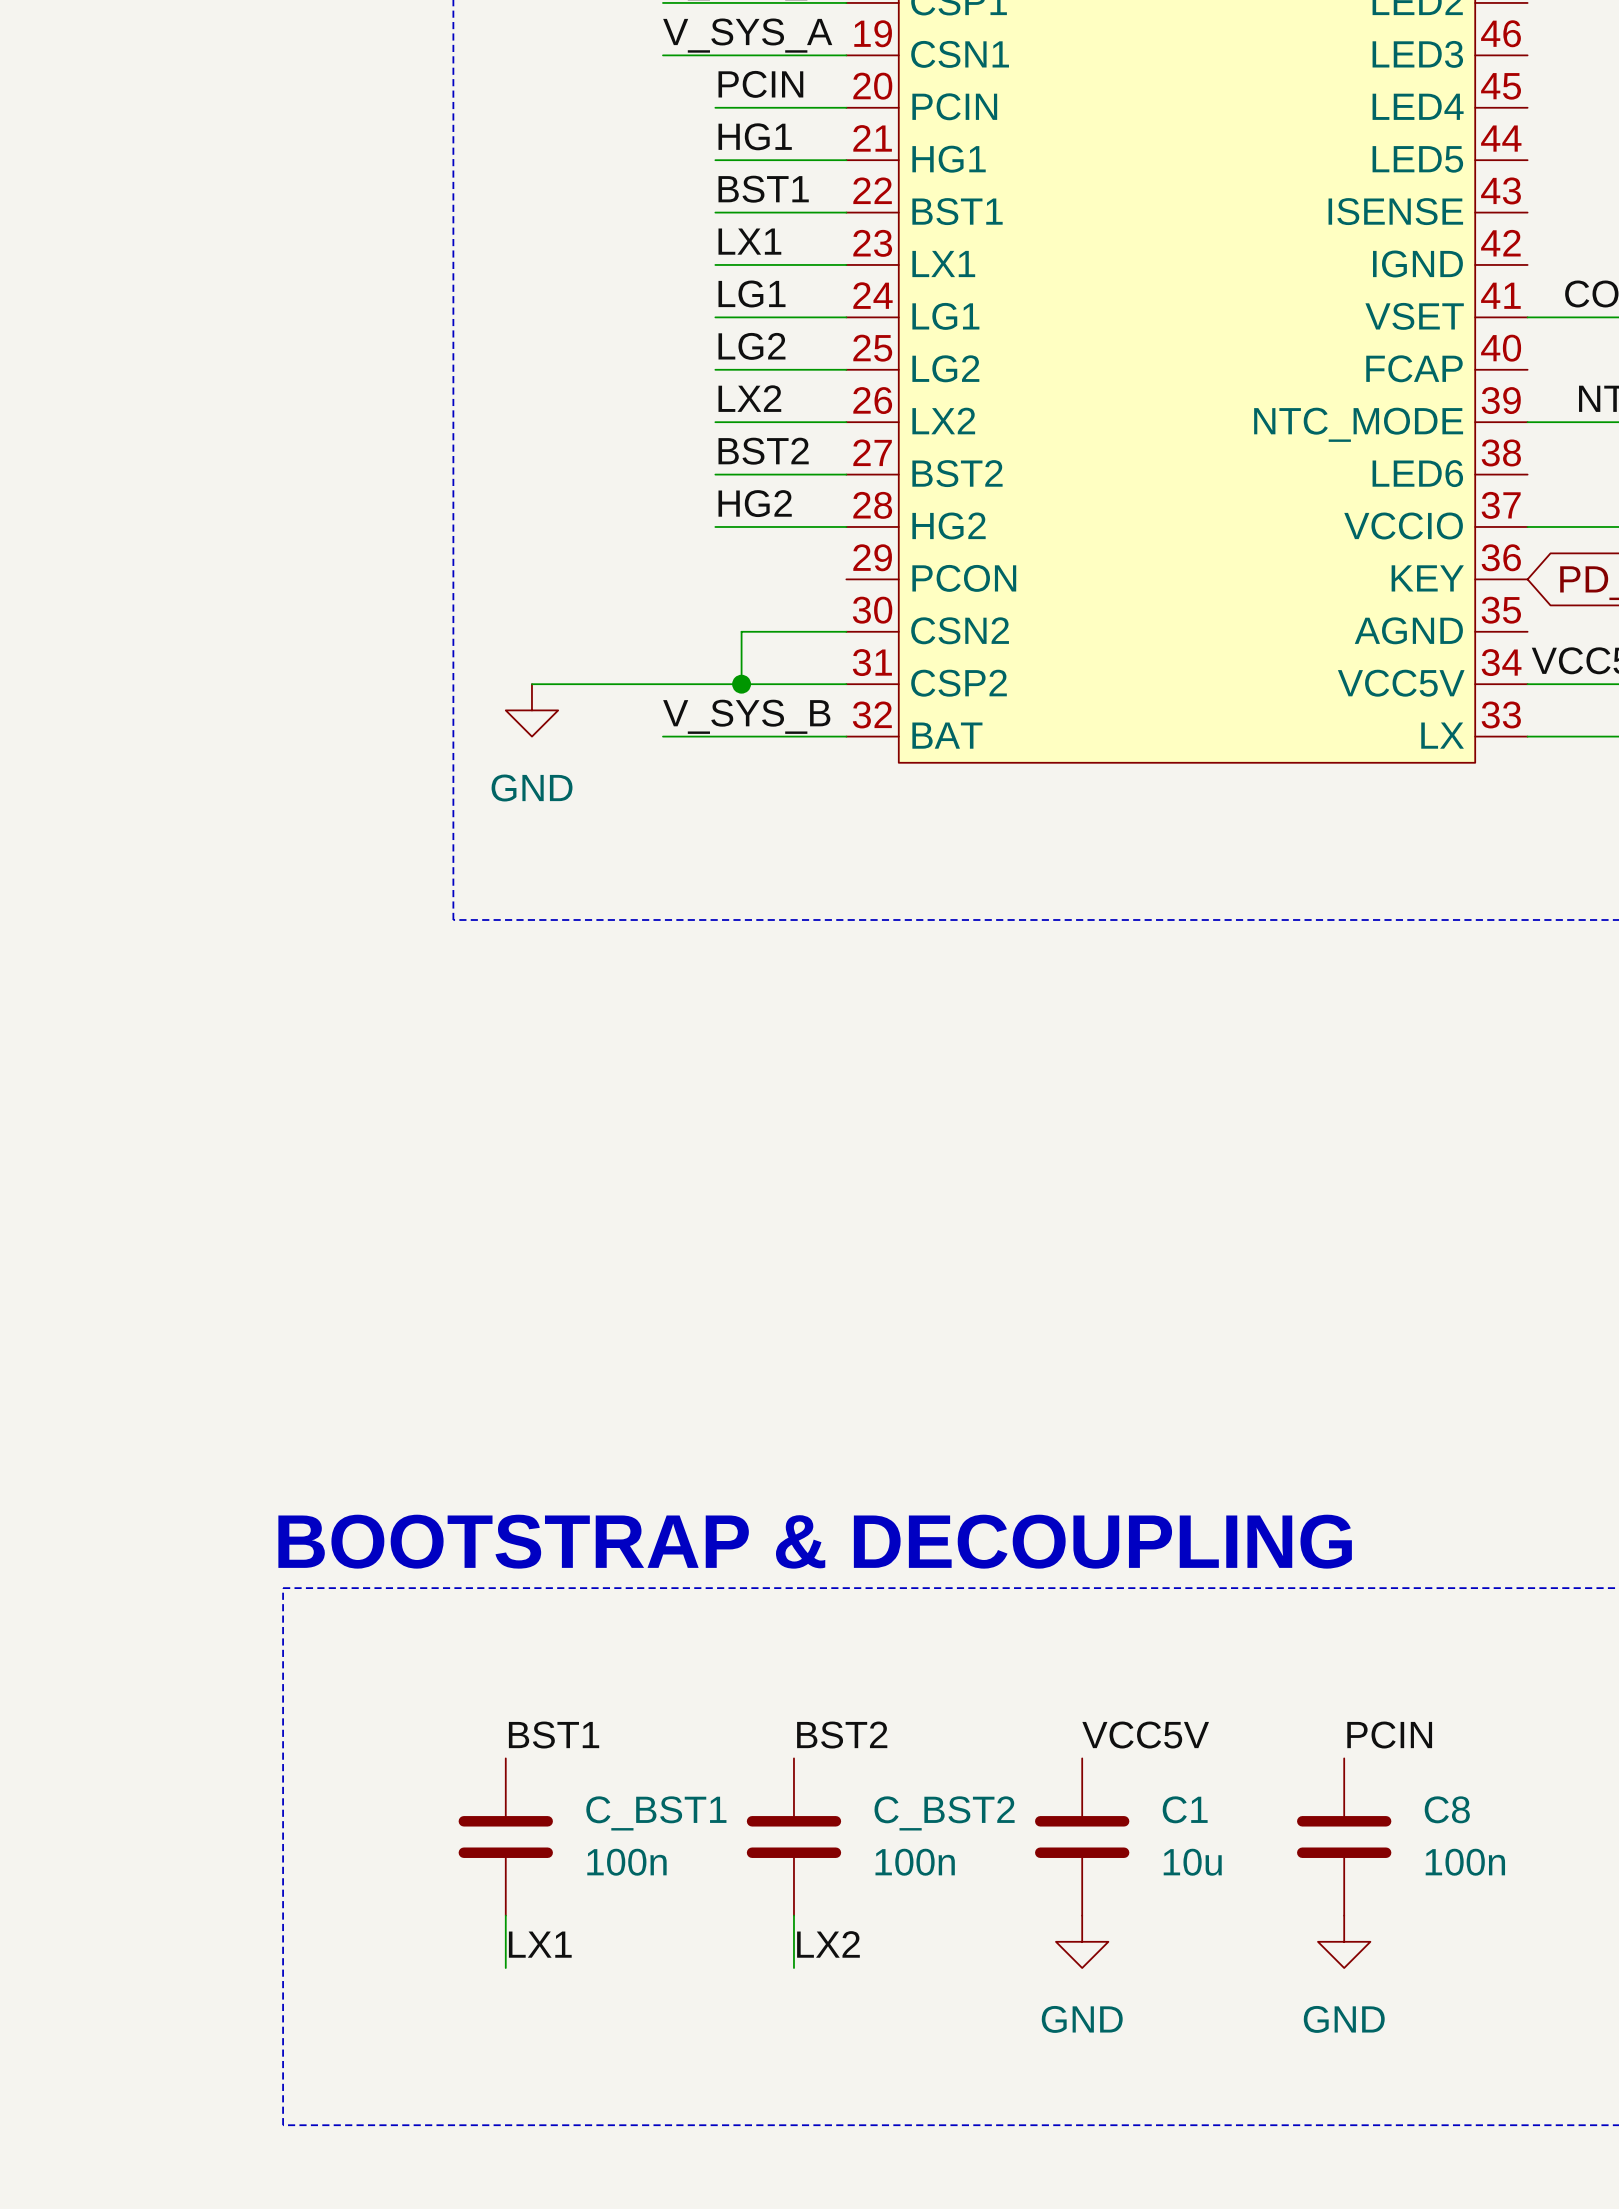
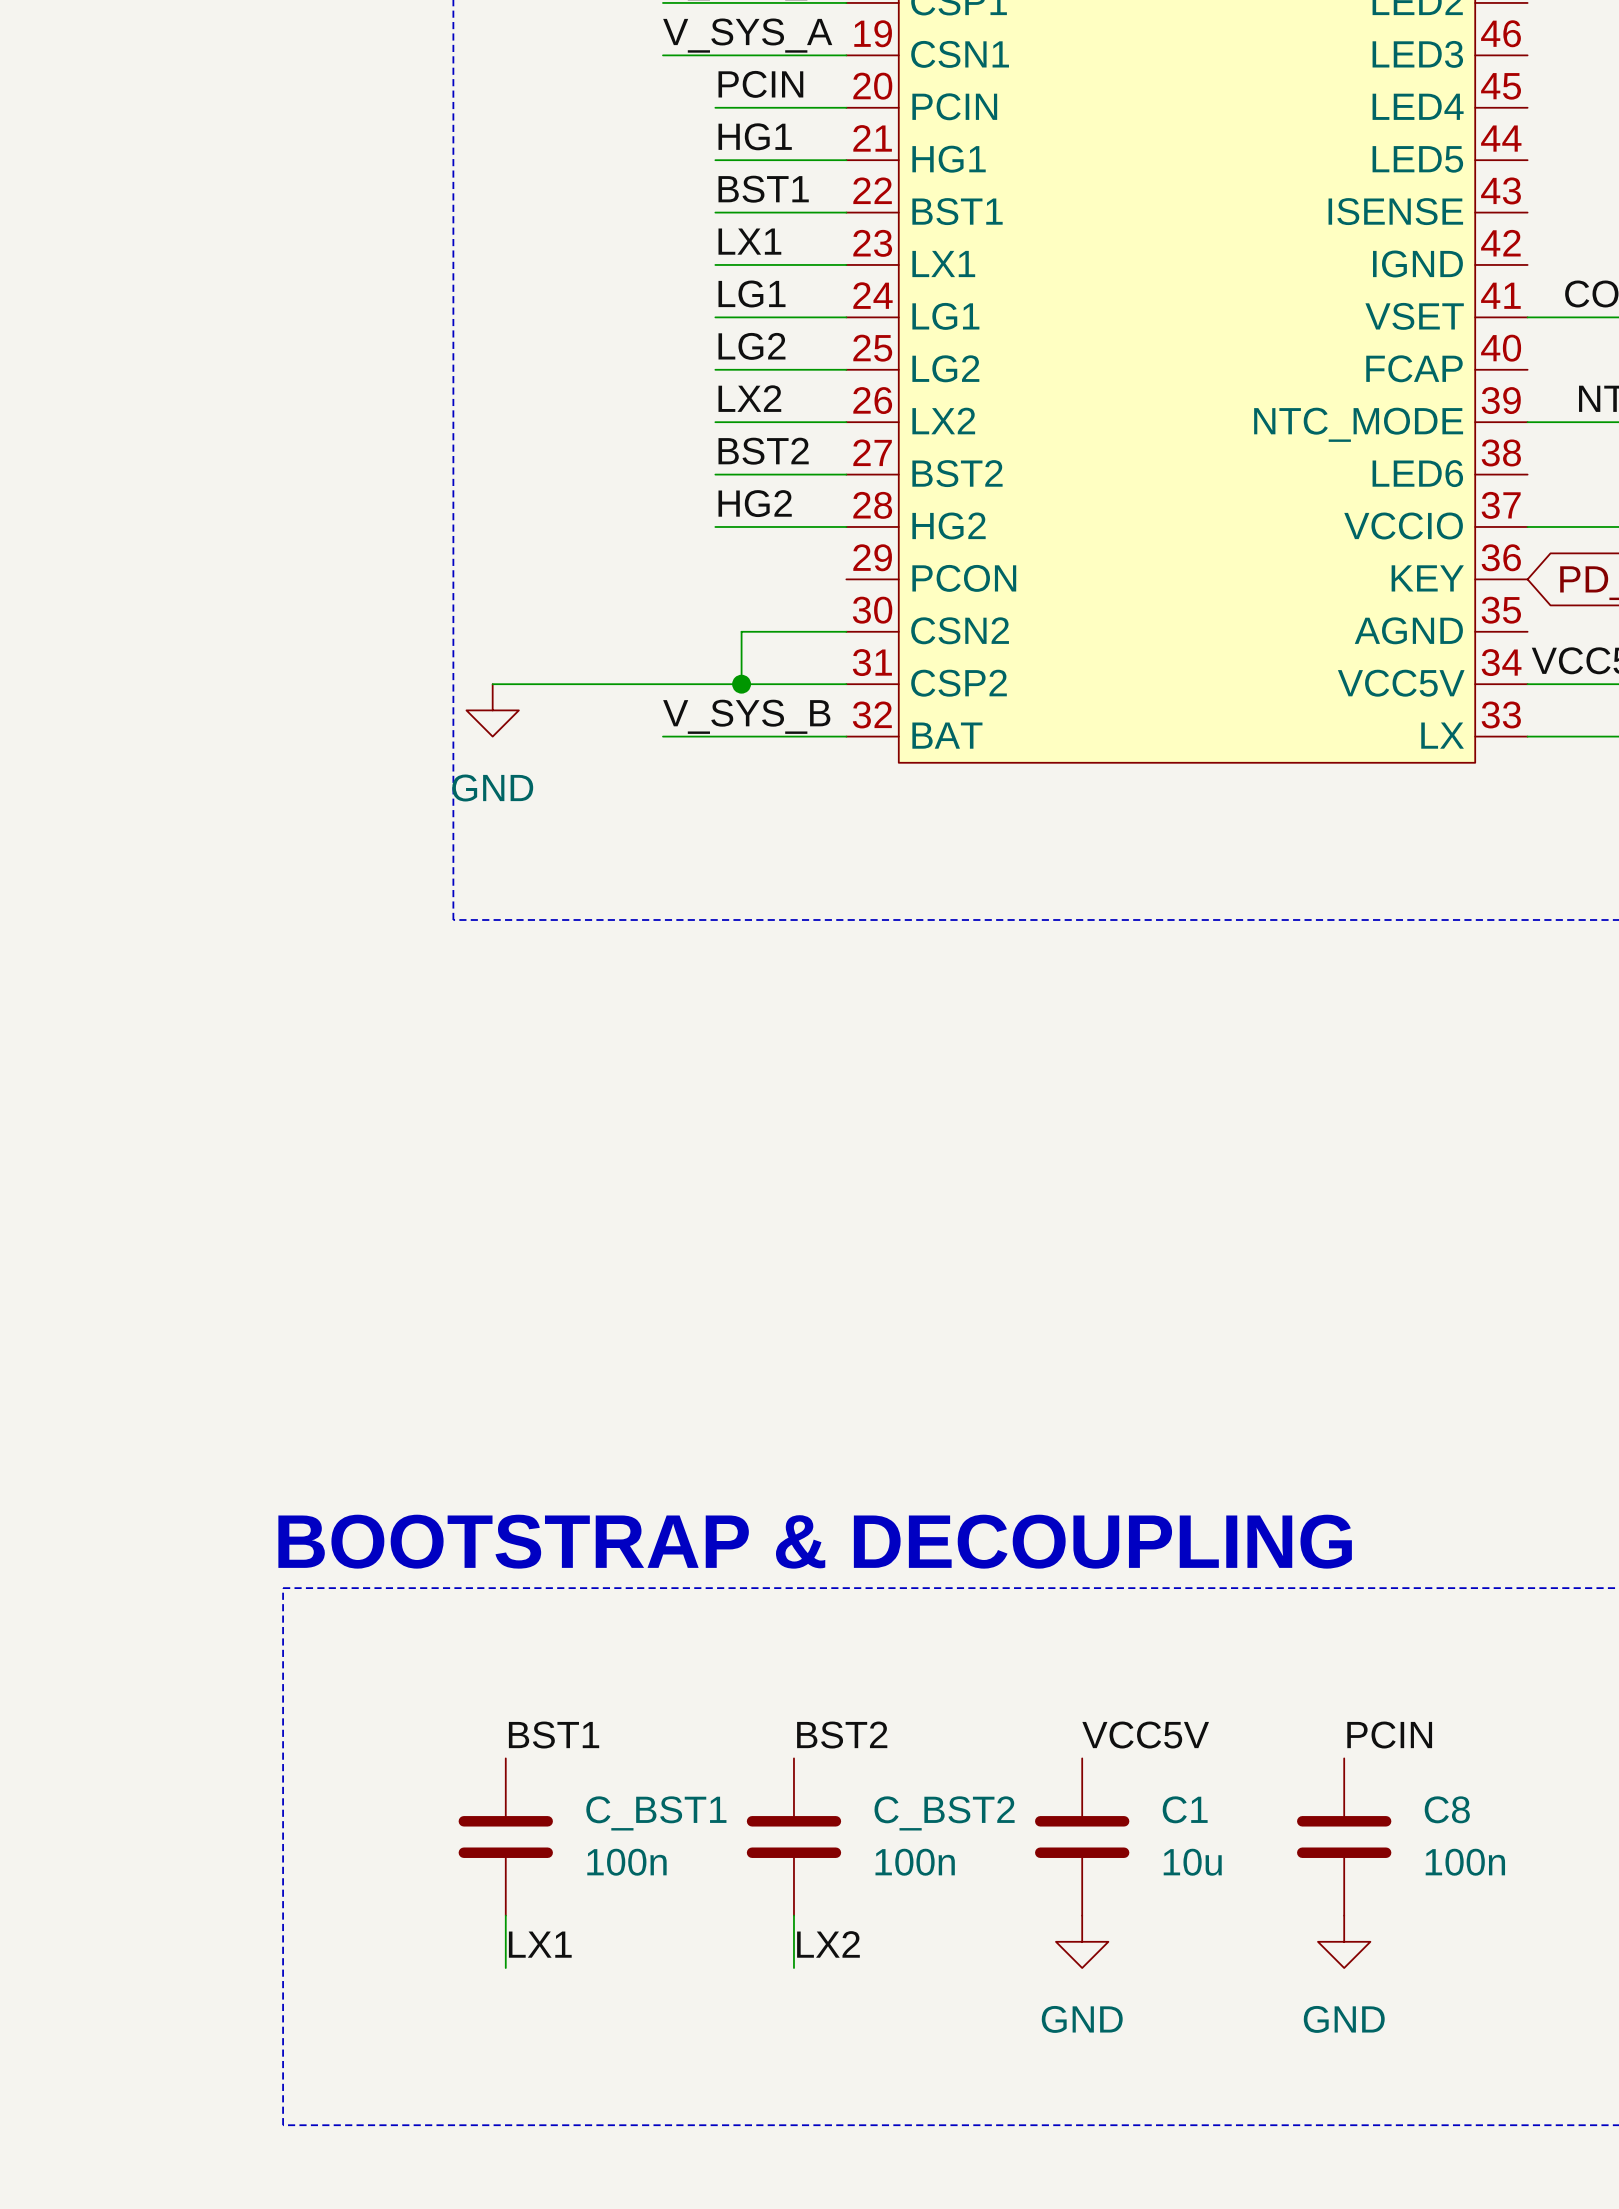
wire: none -> (492, 684) (531, 684)
power symbol position: GND (531, 710) -> GND (492, 710)

